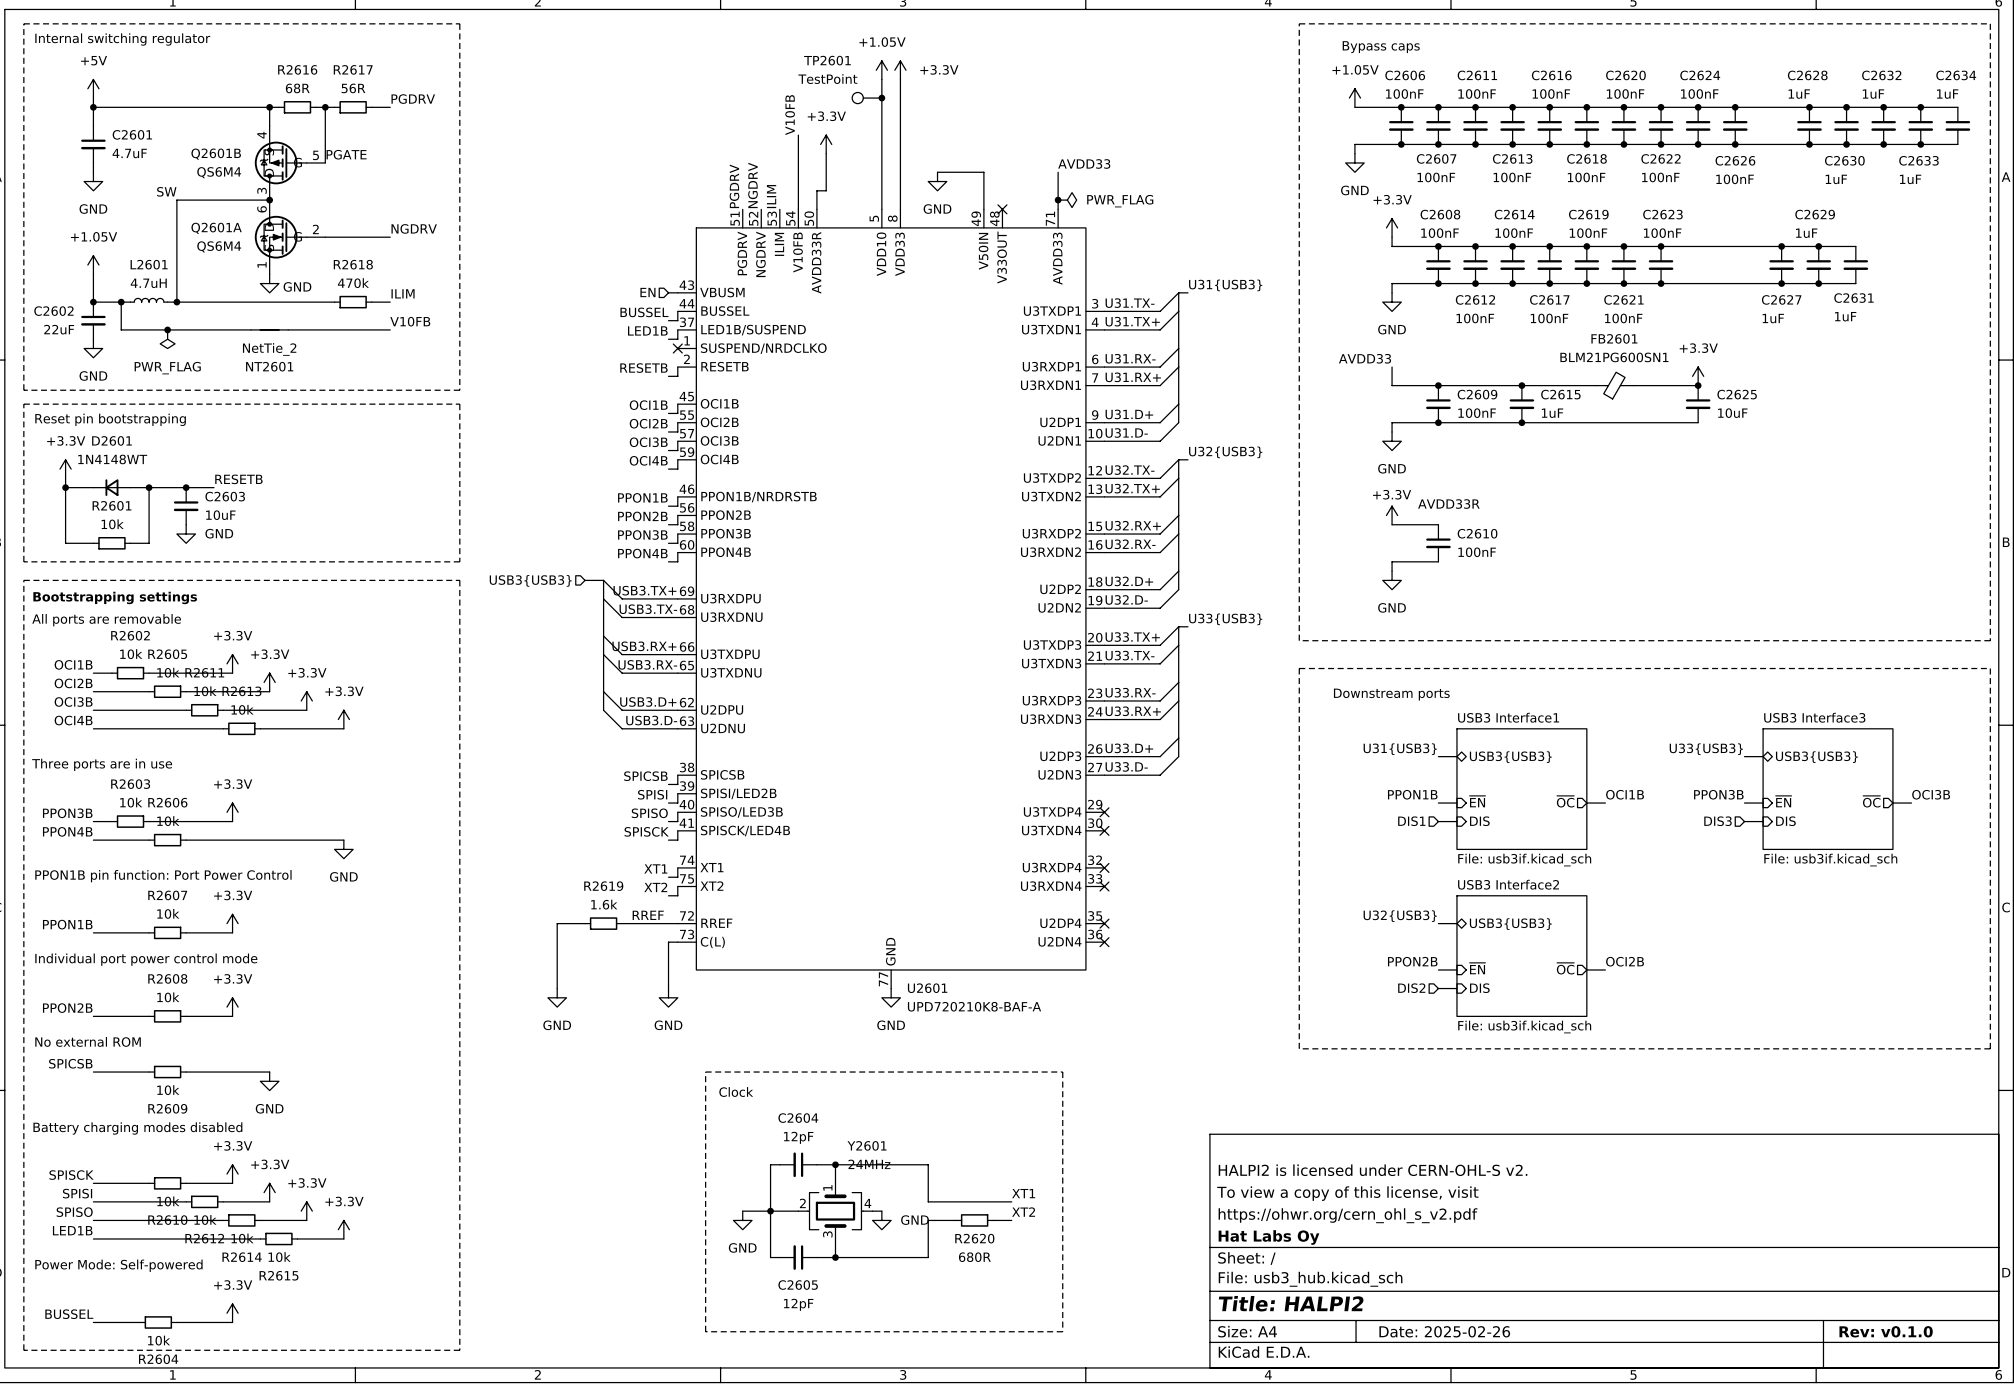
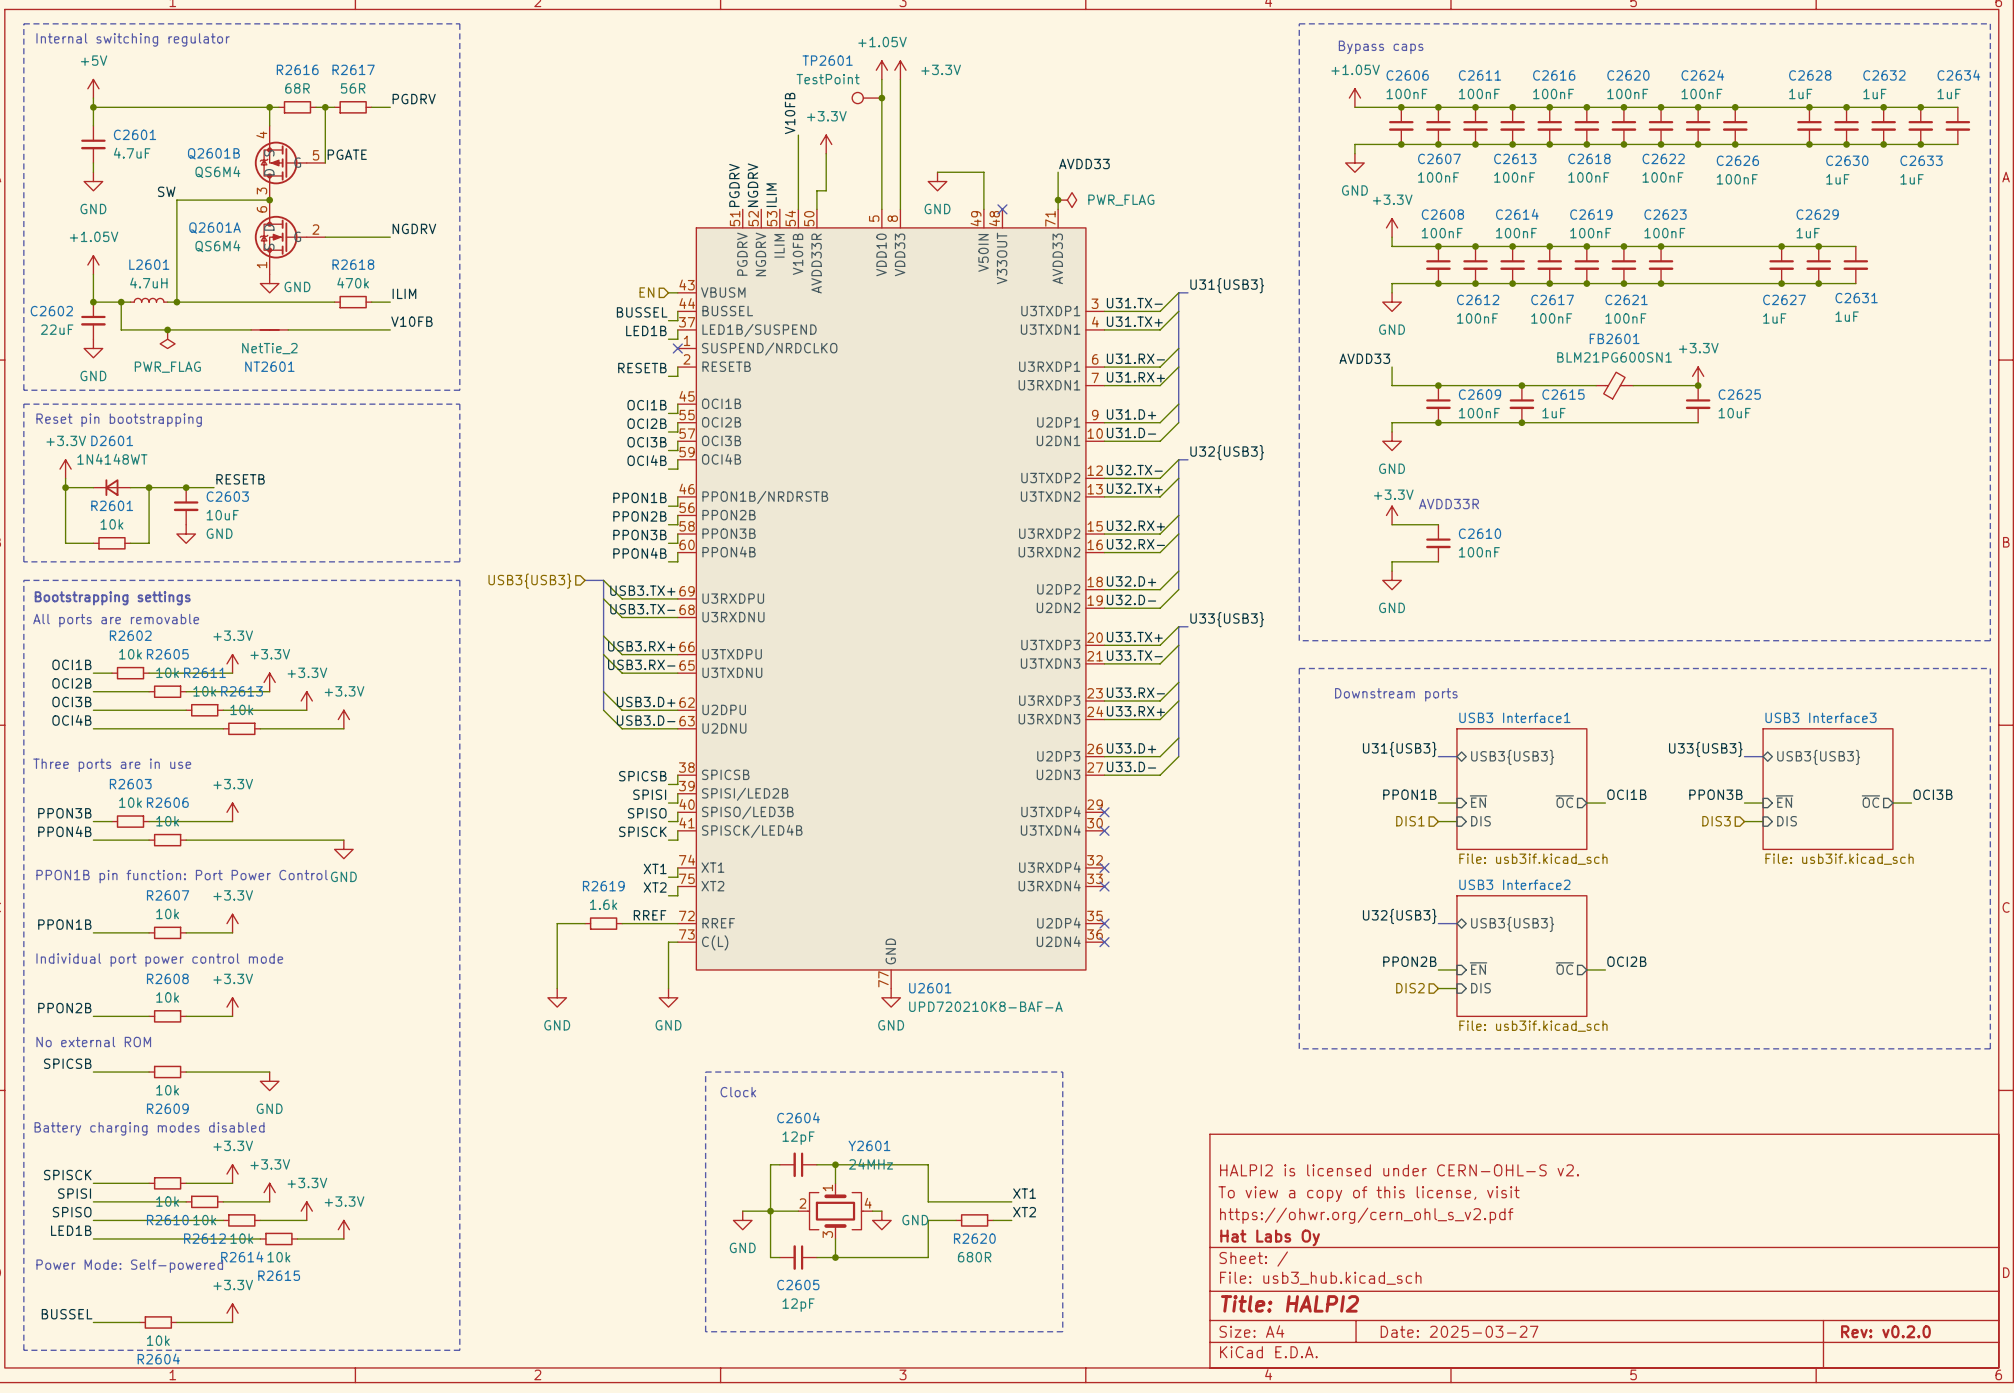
title block: Date: 2025-02-26 (1444, 1331) -> Date: 2025-03-27 (1459, 1331)
title block: Rev: v0.1.0 (1886, 1331) -> Rev: v0.2.0 (1885, 1331)

